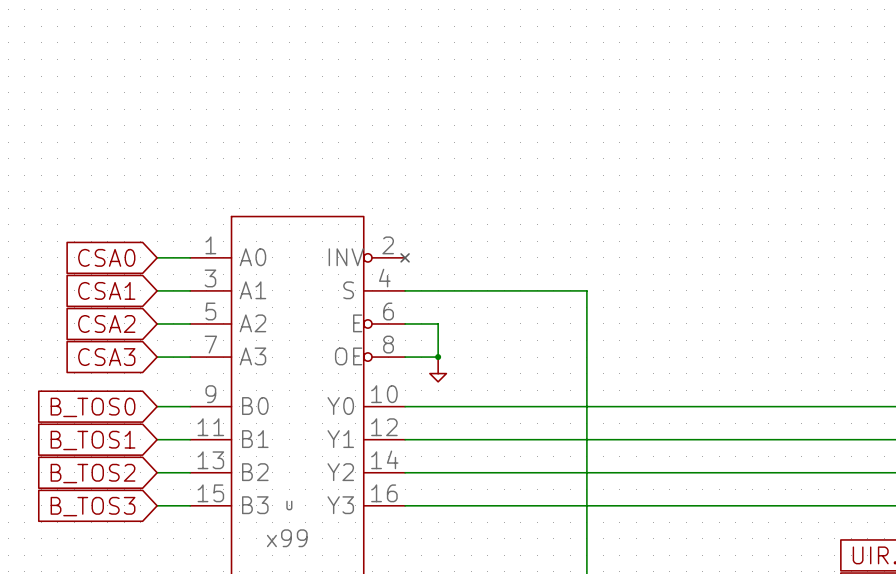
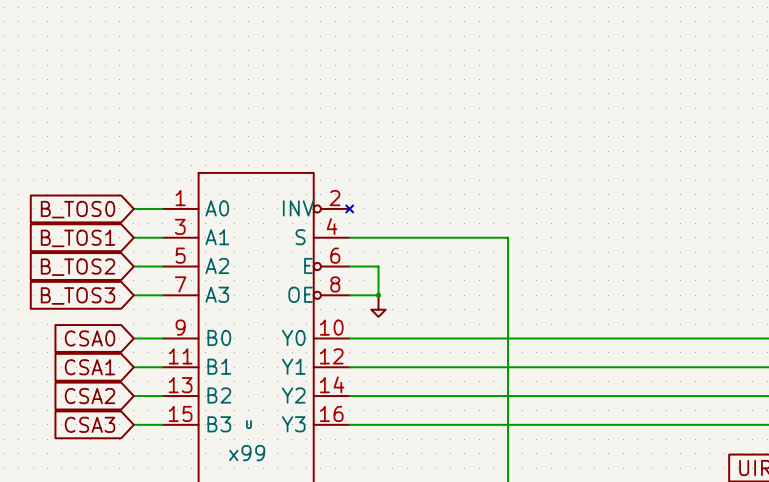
global label: CSA0 (106, 257) -> B_TOS0 (78, 209)
global label: CSA1 (106, 290) -> B_TOS1 (78, 238)
global label: CSA2 (106, 323) -> B_TOS2 (78, 267)
global label: CSA3 (106, 357) -> B_TOS3 (78, 295)
global label: B_TOS0 (93, 407) -> CSA0 (90, 338)
global label: B_TOS1 (93, 440) -> CSA1 (90, 367)
global label: B_TOS2 (93, 473) -> CSA2 (90, 396)
global label: B_TOS3 (93, 506) -> CSA3 (90, 424)

